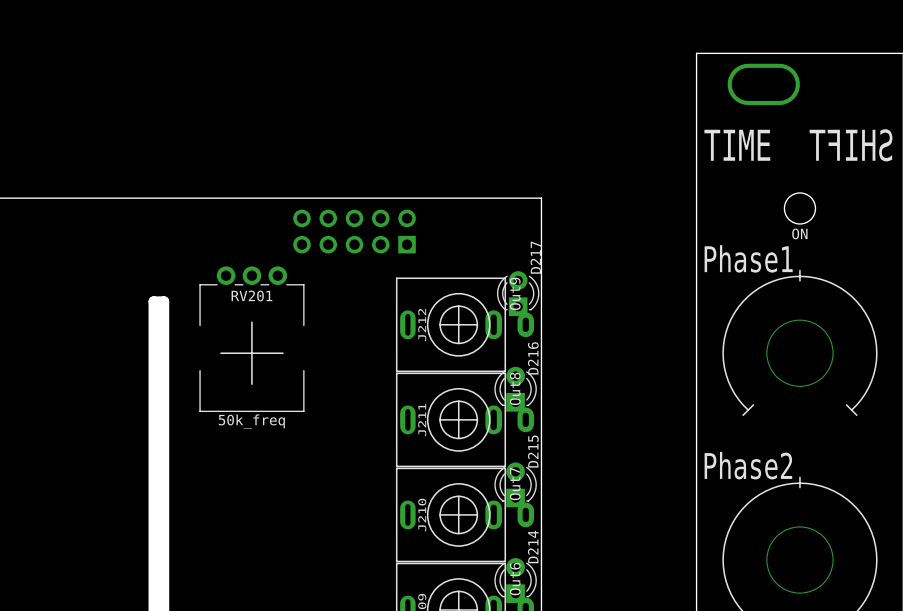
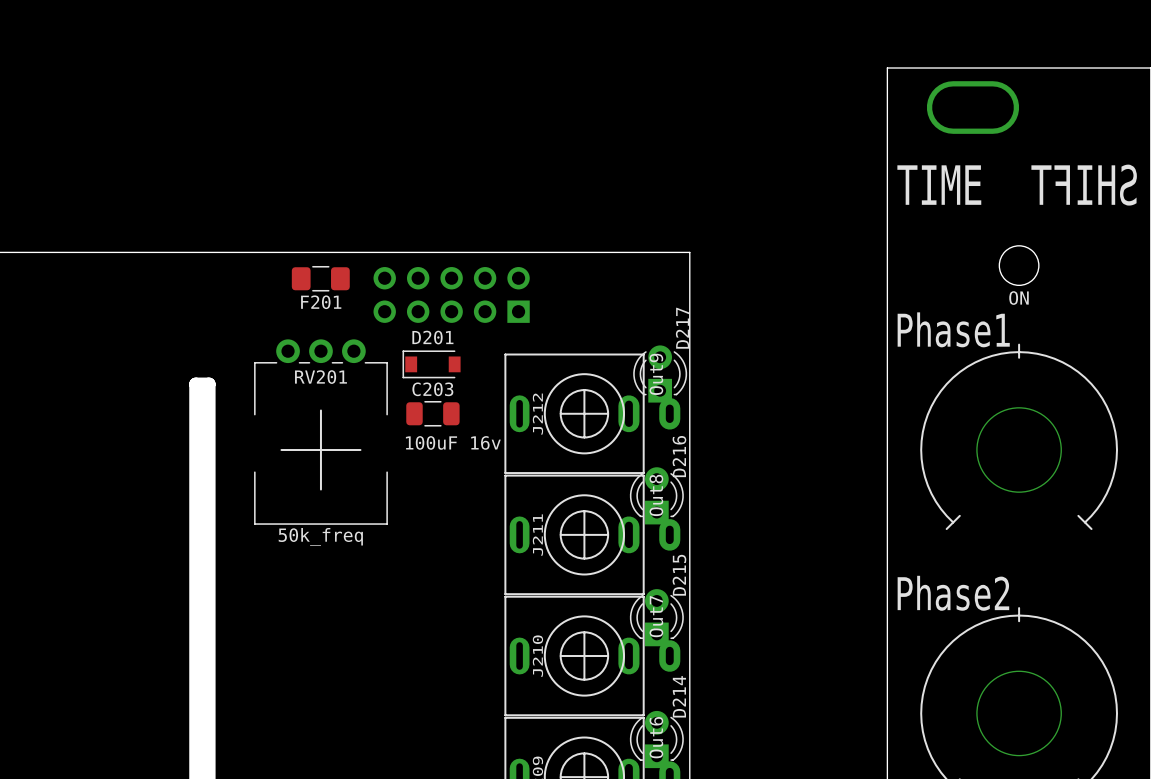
F201: none -> (320, 278)
D201: none -> (431, 364)
C203: none -> 100uF 16v (432, 413)

